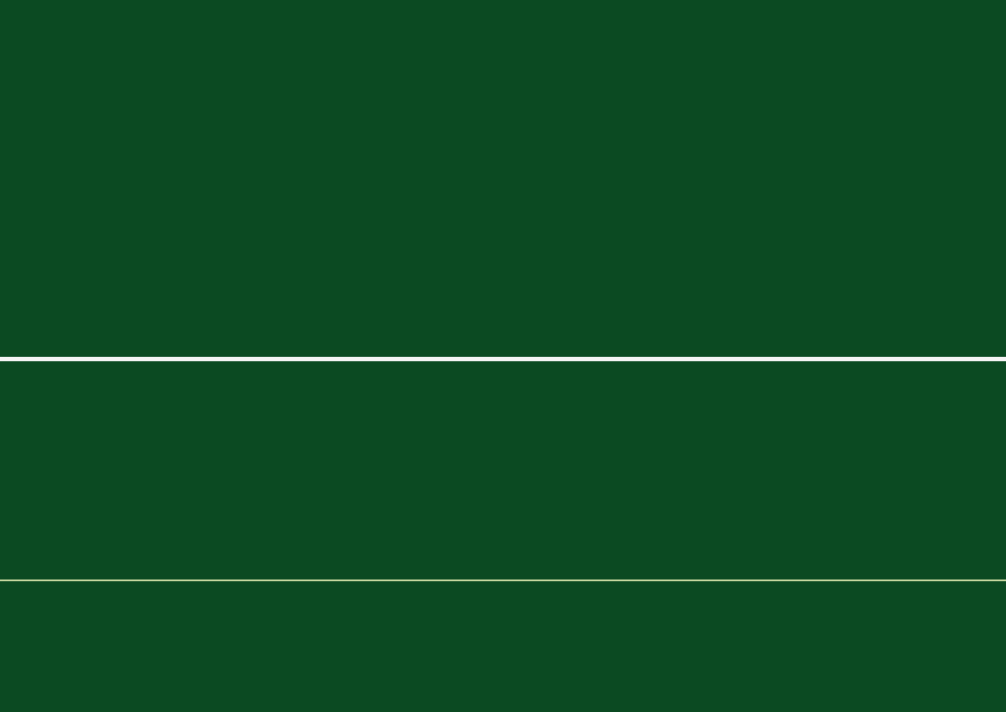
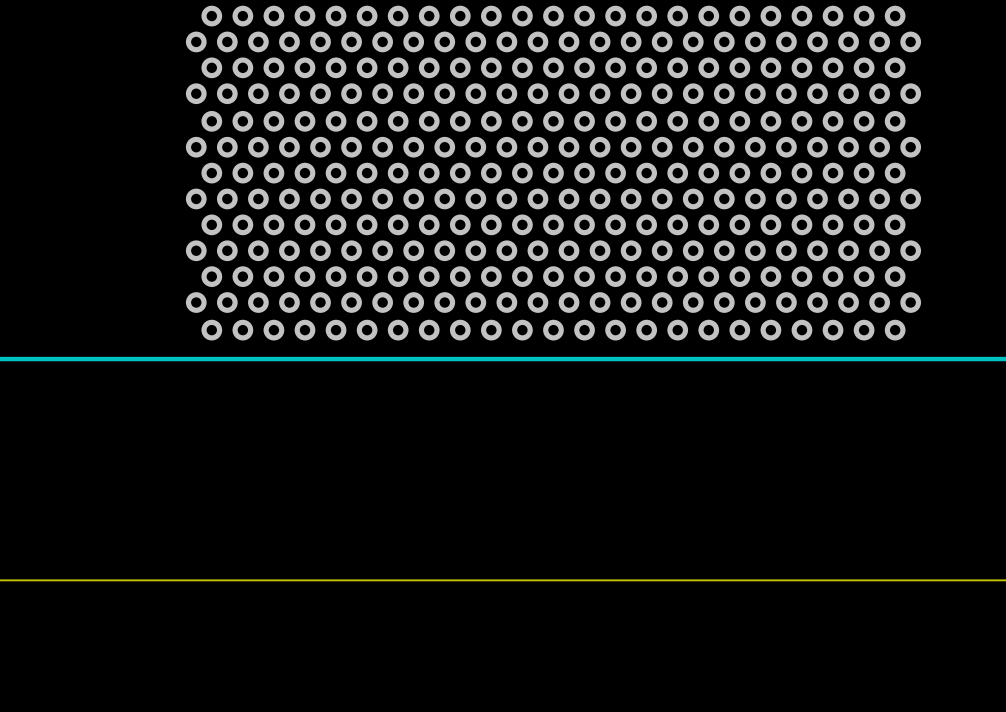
via: none -> (211, 16)
via: none -> (242, 16)
via: none -> (273, 16)
via: none -> (304, 16)
via: none -> (336, 16)
via: none -> (367, 16)
via: none -> (398, 16)
via: none -> (429, 16)
via: none -> (460, 16)
via: none -> (491, 16)
via: none -> (522, 16)
via: none -> (553, 16)
via: none -> (584, 16)
via: none -> (615, 16)
via: none -> (646, 16)
via: none -> (677, 16)
via: none -> (708, 16)
via: none -> (739, 16)
via: none -> (770, 16)
via: none -> (801, 16)
via: none -> (833, 16)
via: none -> (864, 16)
via: none -> (895, 16)
via: none -> (196, 41)
via: none -> (227, 41)
via: none -> (258, 41)
via: none -> (289, 41)
via: none -> (320, 41)
via: none -> (351, 41)
via: none -> (382, 41)
via: none -> (413, 41)
via: none -> (444, 41)
via: none -> (475, 41)
via: none -> (506, 41)
via: none -> (537, 41)
via: none -> (569, 41)
via: none -> (600, 41)
via: none -> (631, 41)
via: none -> (662, 41)
via: none -> (693, 41)
via: none -> (724, 41)
via: none -> (755, 41)
via: none -> (786, 41)
via: none -> (817, 41)
via: none -> (848, 41)
via: none -> (879, 41)
via: none -> (910, 41)
via: none -> (211, 67)
via: none -> (242, 67)
via: none -> (273, 67)
via: none -> (304, 67)
via: none -> (336, 67)
via: none -> (367, 67)
via: none -> (398, 67)
via: none -> (429, 67)
via: none -> (460, 67)
via: none -> (491, 67)
via: none -> (522, 67)
via: none -> (553, 67)
via: none -> (584, 67)
via: none -> (615, 67)
via: none -> (646, 67)
via: none -> (677, 67)
via: none -> (708, 67)
via: none -> (739, 67)
via: none -> (770, 67)
via: none -> (801, 67)
via: none -> (833, 67)
via: none -> (864, 67)
via: none -> (895, 67)
via: none -> (196, 93)
via: none -> (227, 93)
via: none -> (258, 93)
via: none -> (289, 93)
via: none -> (320, 93)
via: none -> (351, 93)
via: none -> (382, 93)
via: none -> (413, 93)
via: none -> (444, 93)
via: none -> (475, 93)
via: none -> (506, 93)
via: none -> (537, 93)
via: none -> (569, 93)
via: none -> (600, 93)
via: none -> (631, 93)
via: none -> (662, 93)
via: none -> (693, 93)
via: none -> (724, 93)
via: none -> (755, 93)
via: none -> (786, 93)
via: none -> (817, 93)
via: none -> (848, 93)
via: none -> (879, 93)
via: none -> (910, 93)
via: none -> (211, 121)
via: none -> (242, 121)
via: none -> (273, 121)
via: none -> (304, 121)
via: none -> (336, 121)
via: none -> (367, 121)
via: none -> (398, 121)
via: none -> (429, 121)
via: none -> (460, 121)
via: none -> (491, 121)
via: none -> (522, 121)
via: none -> (553, 121)
via: none -> (584, 121)
via: none -> (615, 121)
via: none -> (646, 121)
via: none -> (677, 121)
via: none -> (708, 121)
via: none -> (739, 121)
via: none -> (770, 121)
via: none -> (801, 121)
via: none -> (833, 121)
via: none -> (864, 121)
via: none -> (895, 121)
via: none -> (196, 147)
via: none -> (227, 147)
via: none -> (258, 147)
via: none -> (289, 147)
via: none -> (320, 147)
via: none -> (351, 147)
via: none -> (382, 147)
via: none -> (413, 147)
via: none -> (444, 147)
via: none -> (475, 147)
via: none -> (506, 147)
via: none -> (537, 147)
via: none -> (569, 147)
via: none -> (600, 147)
via: none -> (631, 147)
via: none -> (662, 147)
via: none -> (693, 147)
via: none -> (724, 147)
via: none -> (755, 147)
via: none -> (786, 147)
via: none -> (817, 147)
via: none -> (848, 147)
via: none -> (879, 147)
via: none -> (910, 147)
via: none -> (211, 173)
via: none -> (242, 173)
via: none -> (273, 173)
via: none -> (304, 173)
via: none -> (336, 173)
via: none -> (367, 173)
via: none -> (398, 173)
via: none -> (429, 173)
via: none -> (460, 173)
via: none -> (491, 173)
via: none -> (522, 173)
via: none -> (553, 173)
via: none -> (584, 173)
via: none -> (615, 173)
via: none -> (646, 173)
via: none -> (677, 173)
via: none -> (708, 173)
via: none -> (739, 173)
via: none -> (770, 173)
via: none -> (801, 173)
via: none -> (833, 173)
via: none -> (864, 173)
via: none -> (895, 173)
via: none -> (196, 198)
via: none -> (227, 198)
via: none -> (258, 198)
via: none -> (289, 198)
via: none -> (320, 198)
via: none -> (351, 198)
via: none -> (382, 198)
via: none -> (413, 198)
via: none -> (444, 198)
via: none -> (475, 198)
via: none -> (506, 198)
via: none -> (537, 198)
via: none -> (569, 198)
via: none -> (600, 198)
via: none -> (631, 198)
via: none -> (662, 198)
via: none -> (693, 198)
via: none -> (724, 198)
via: none -> (755, 198)
via: none -> (786, 198)
via: none -> (817, 198)
via: none -> (848, 198)
via: none -> (879, 198)
via: none -> (910, 198)
via: none -> (211, 224)
via: none -> (242, 224)
via: none -> (273, 224)
via: none -> (304, 224)
via: none -> (336, 224)
via: none -> (367, 224)
via: none -> (398, 224)
via: none -> (429, 224)
via: none -> (460, 224)
via: none -> (491, 224)
via: none -> (522, 224)
via: none -> (553, 224)
via: none -> (584, 224)
via: none -> (615, 224)
via: none -> (646, 224)
via: none -> (677, 224)
via: none -> (708, 224)
via: none -> (739, 224)
via: none -> (770, 224)
via: none -> (801, 224)
via: none -> (833, 224)
via: none -> (864, 224)
via: none -> (895, 224)
via: none -> (196, 250)
via: none -> (227, 250)
via: none -> (258, 250)
via: none -> (289, 250)
via: none -> (320, 250)
via: none -> (351, 250)
via: none -> (382, 250)
via: none -> (413, 250)
via: none -> (444, 250)
via: none -> (475, 250)
via: none -> (506, 250)
via: none -> (537, 250)
via: none -> (569, 250)
via: none -> (600, 250)
via: none -> (631, 250)
via: none -> (662, 250)
via: none -> (693, 250)
via: none -> (724, 250)
via: none -> (755, 250)
via: none -> (786, 250)
via: none -> (817, 250)
via: none -> (848, 250)
via: none -> (879, 250)
via: none -> (910, 250)
via: none -> (211, 276)
via: none -> (242, 276)
via: none -> (273, 276)
via: none -> (304, 276)
via: none -> (336, 276)
via: none -> (367, 276)
via: none -> (398, 276)
via: none -> (429, 276)
via: none -> (460, 276)
via: none -> (491, 276)
via: none -> (522, 276)
via: none -> (553, 276)
via: none -> (584, 276)
via: none -> (615, 276)
via: none -> (646, 276)
via: none -> (677, 276)
via: none -> (708, 276)
via: none -> (739, 276)
via: none -> (770, 276)
via: none -> (801, 276)
via: none -> (833, 276)
via: none -> (864, 276)
via: none -> (895, 276)
via: none -> (196, 302)
via: none -> (227, 302)
via: none -> (258, 302)
via: none -> (289, 302)
via: none -> (320, 302)
via: none -> (351, 302)
via: none -> (382, 302)
via: none -> (413, 302)
via: none -> (444, 302)
via: none -> (475, 302)
via: none -> (506, 302)
via: none -> (537, 302)
via: none -> (569, 302)
via: none -> (600, 302)
via: none -> (631, 302)
via: none -> (662, 302)
via: none -> (693, 302)
via: none -> (724, 302)
via: none -> (755, 302)
via: none -> (786, 302)
via: none -> (817, 302)
via: none -> (848, 302)
via: none -> (879, 302)
via: none -> (910, 302)
via: none -> (211, 330)
via: none -> (242, 330)
via: none -> (273, 330)
via: none -> (304, 330)
via: none -> (336, 330)
via: none -> (367, 330)
via: none -> (398, 330)
via: none -> (429, 330)
via: none -> (460, 330)
via: none -> (491, 330)
via: none -> (522, 330)
via: none -> (553, 330)
via: none -> (584, 330)
via: none -> (615, 330)
via: none -> (646, 330)
via: none -> (677, 330)
via: none -> (708, 330)
via: none -> (739, 330)
via: none -> (770, 330)
via: none -> (801, 330)
via: none -> (833, 330)
via: none -> (864, 330)
via: none -> (895, 330)

